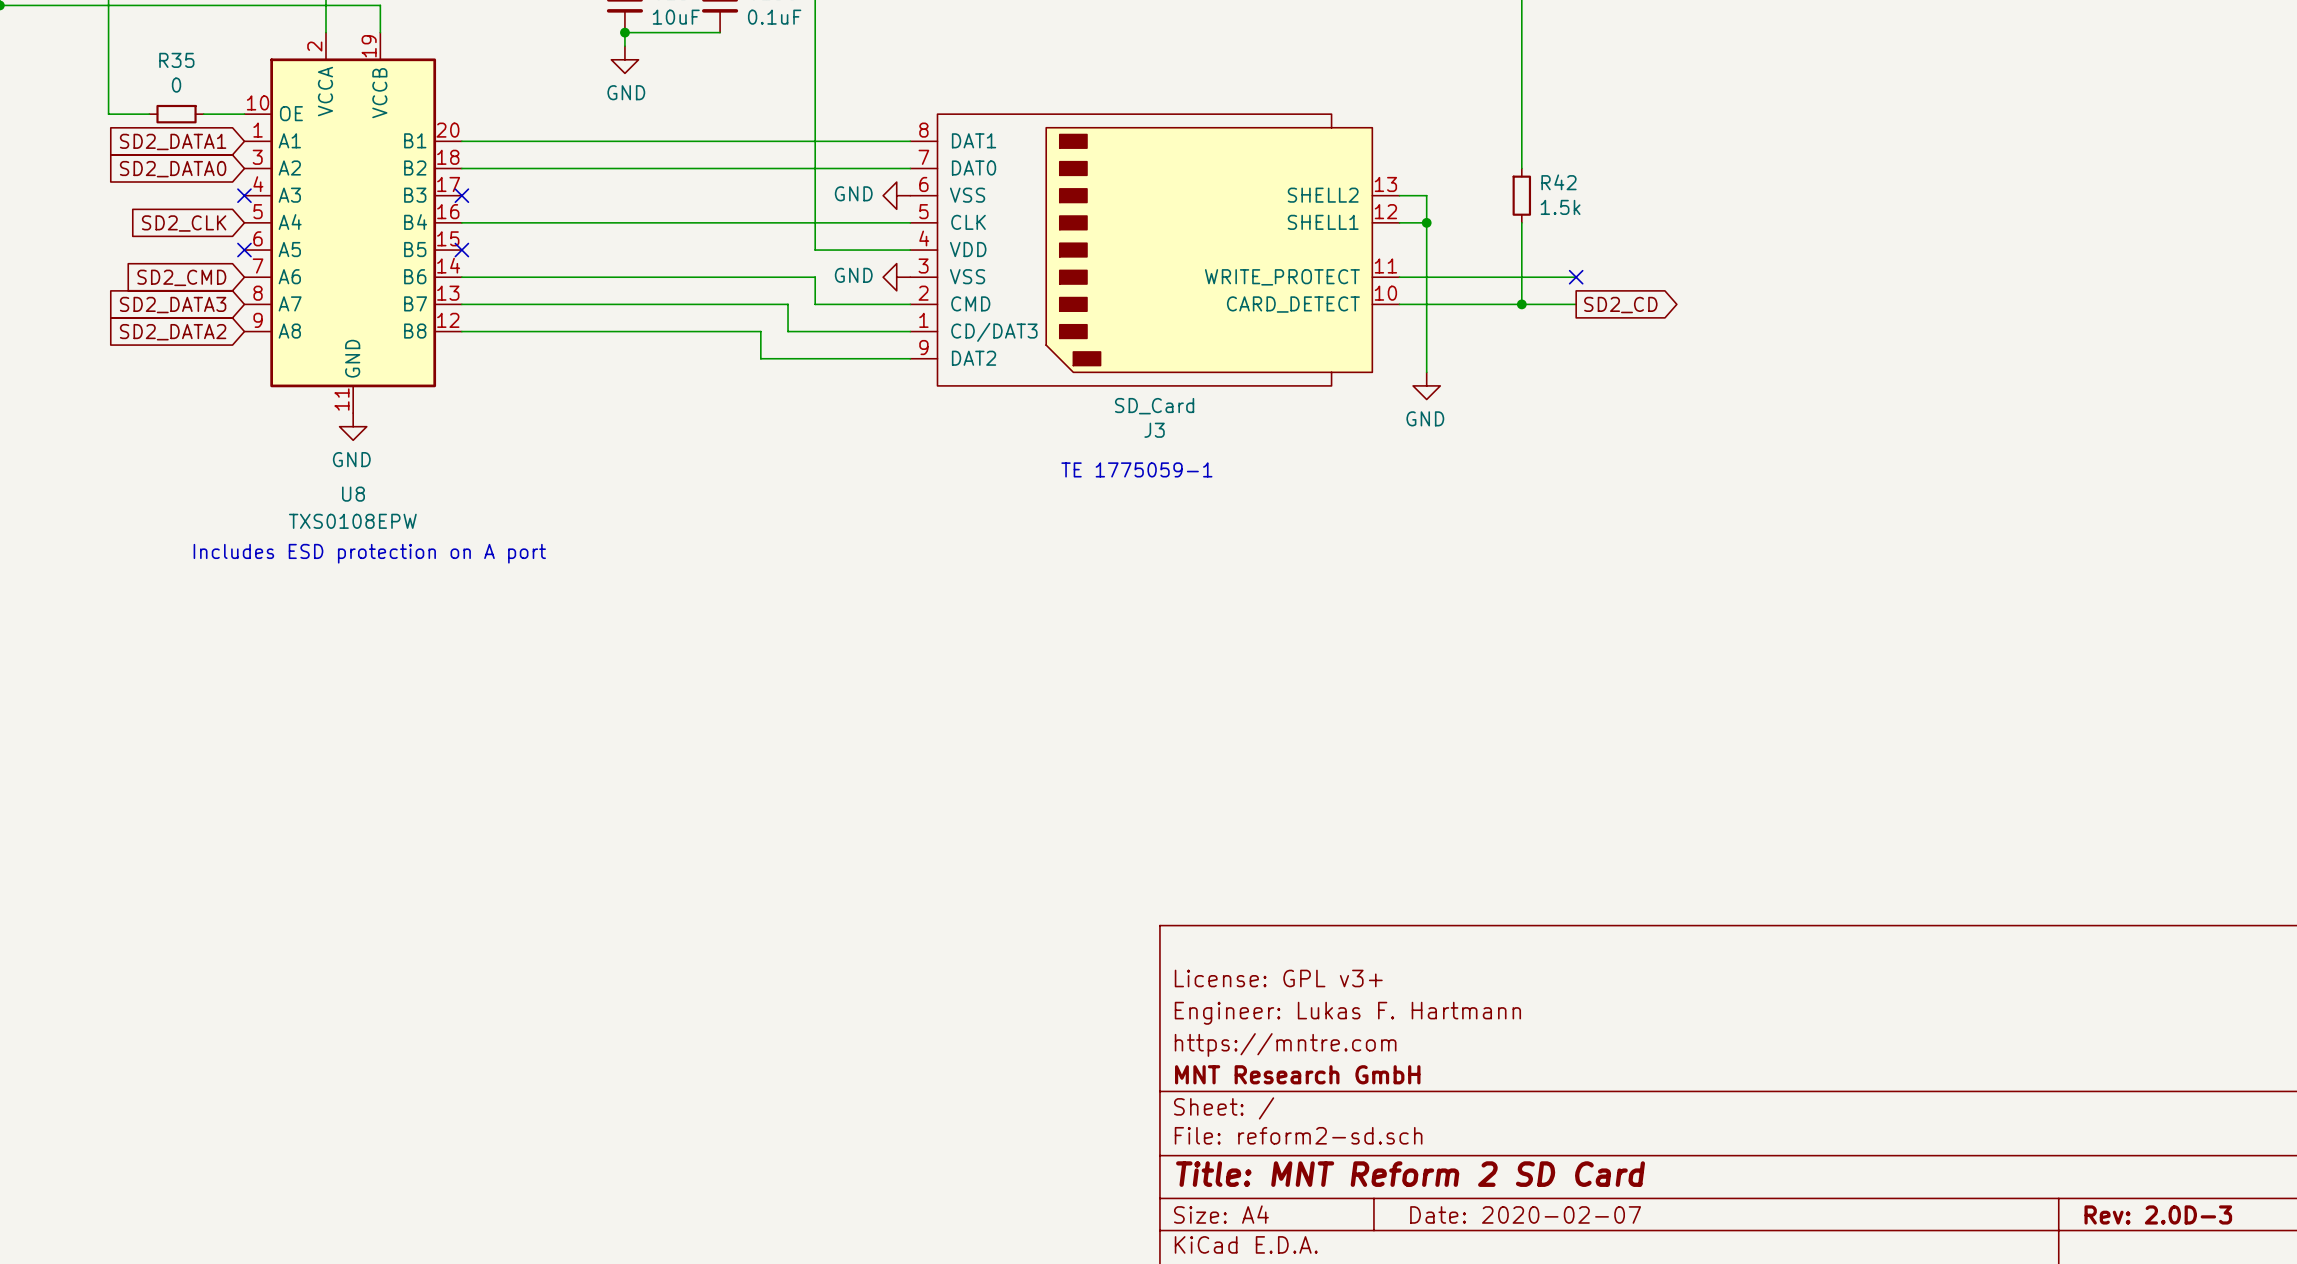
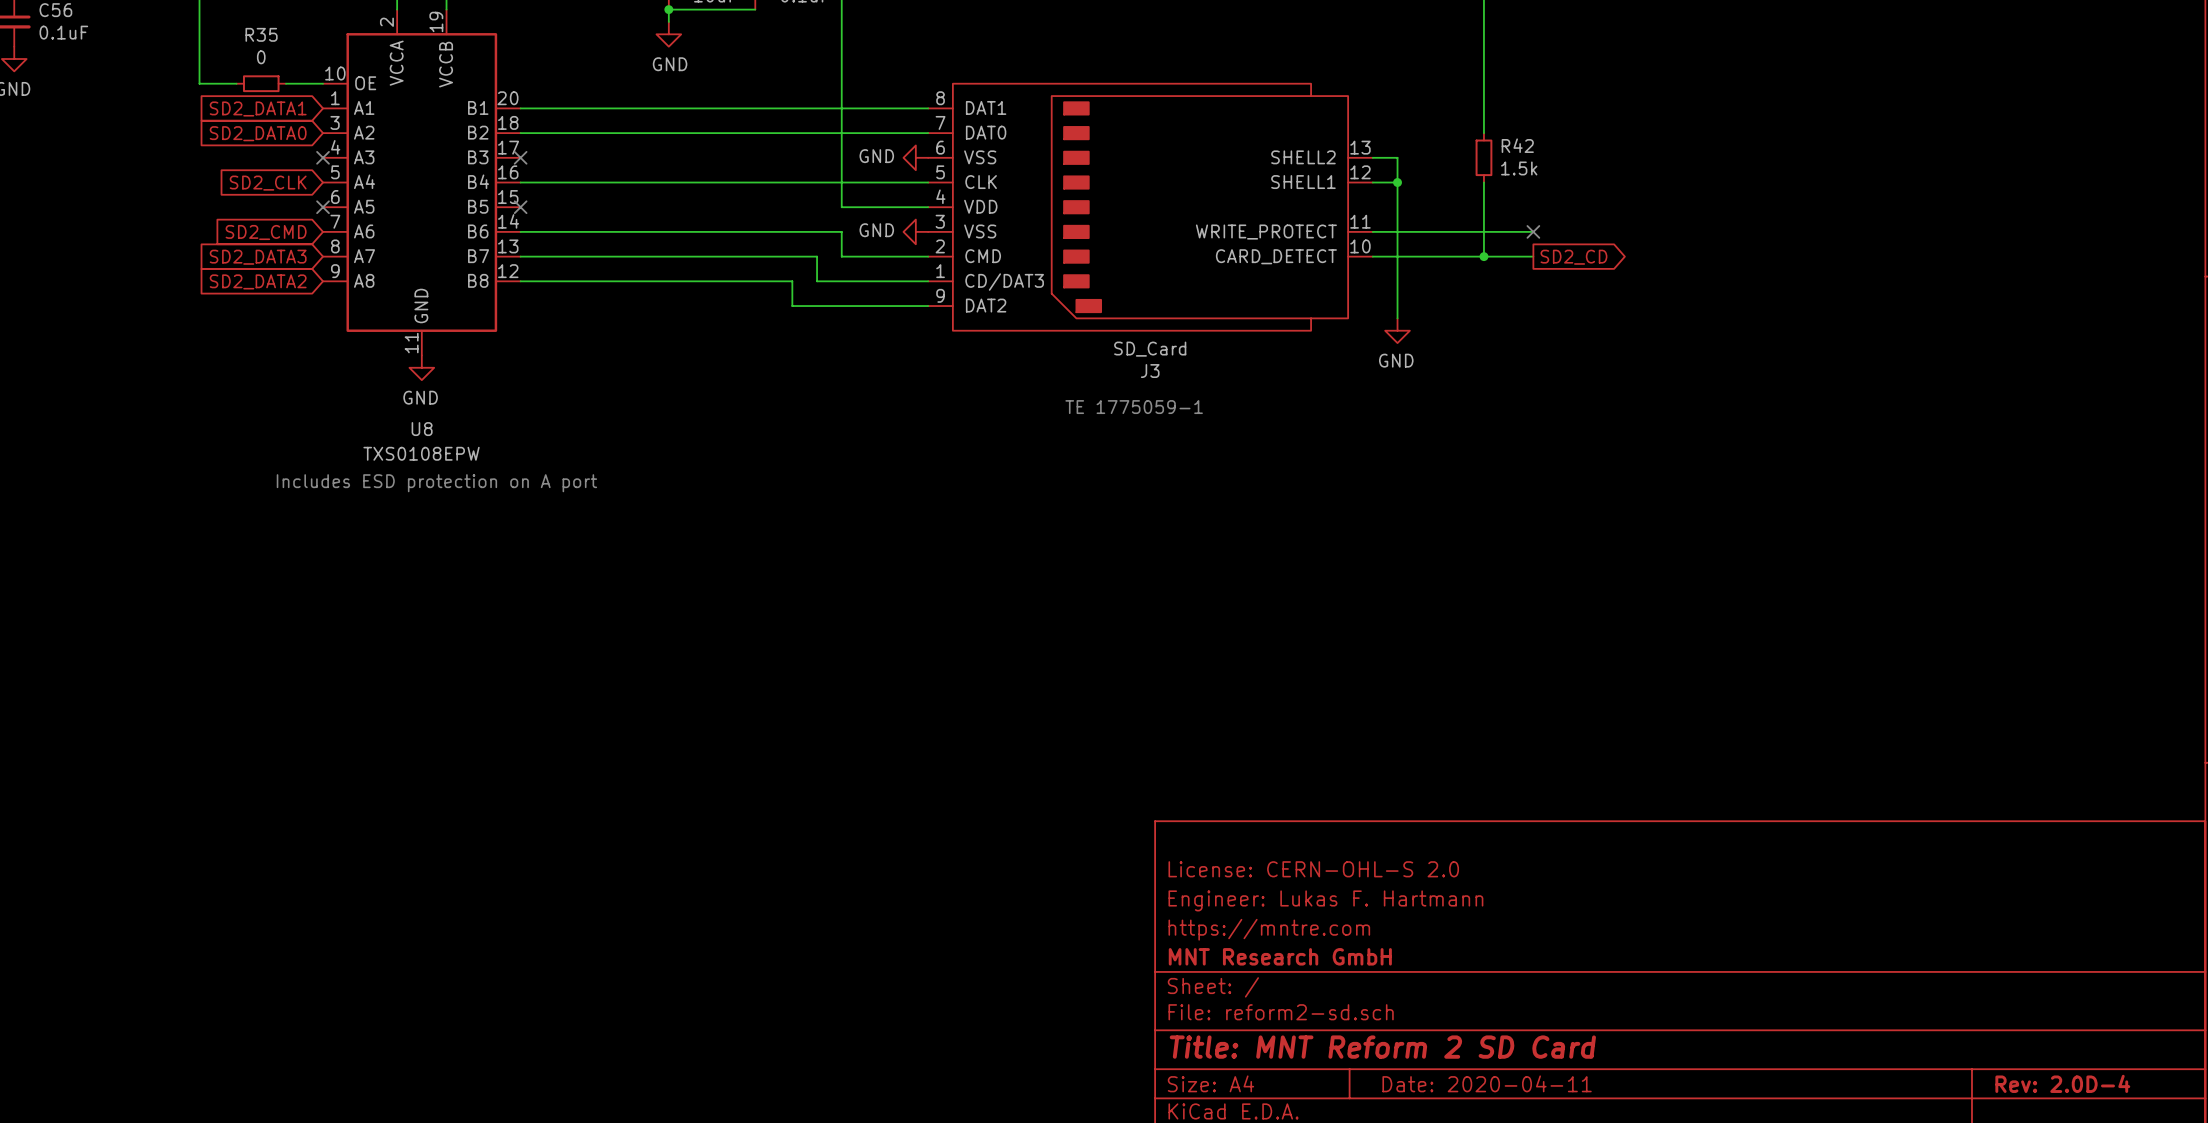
title block: License: GPL v3+ (1278, 978) -> License: CERN-OHL-S 2.0 (1313, 869)
title block: Date: 2020-02-07 (1525, 1214) -> Date: 2020-04-11 (1487, 1083)
title block: Rev: 2.0D-3 (2158, 1214) -> Rev: 2.0D-4 (2062, 1083)

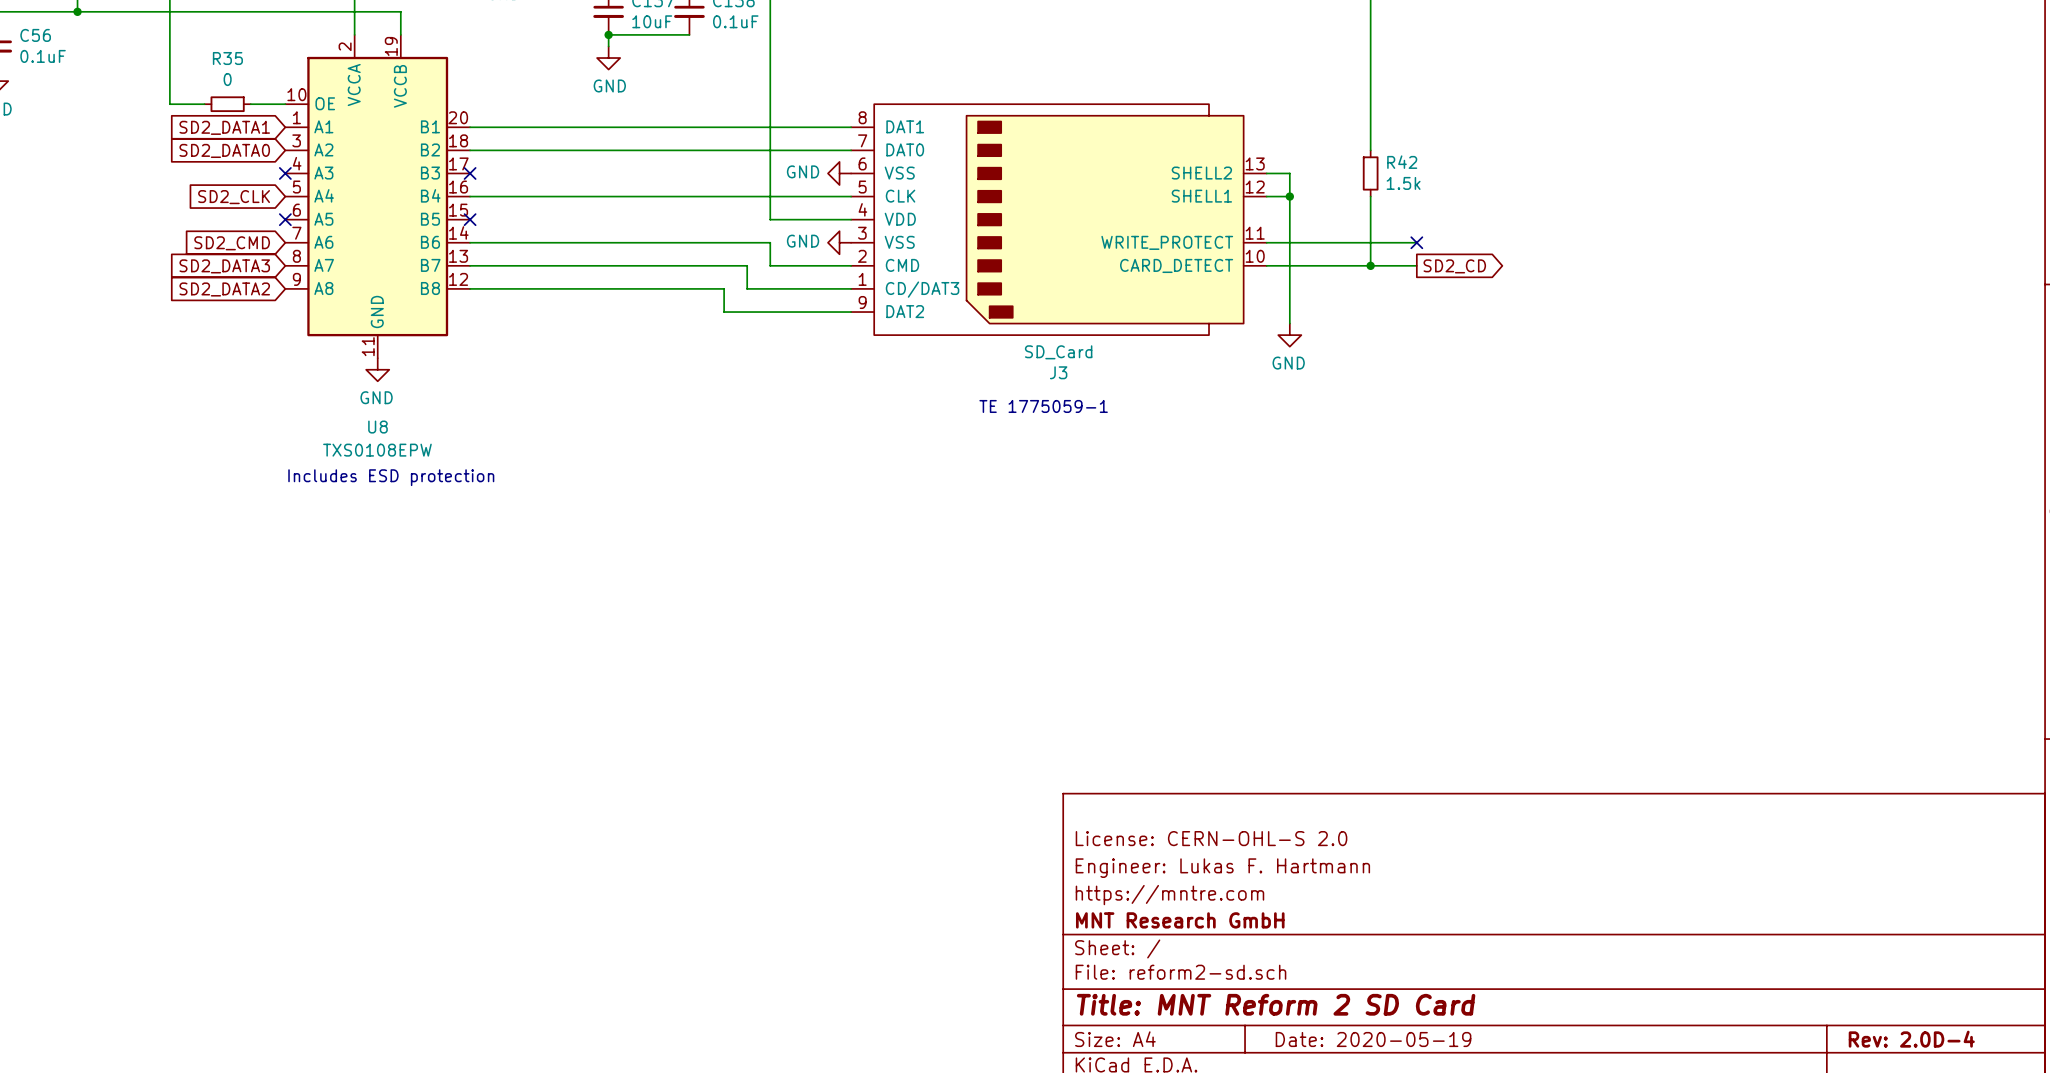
text: Includes ESD protection on A port (436, 483) -> Includes ESD protection (391, 477)
title block: Date: 2020-04-11 (1487, 1083) -> Date: 2020-05-19 (1373, 1039)

